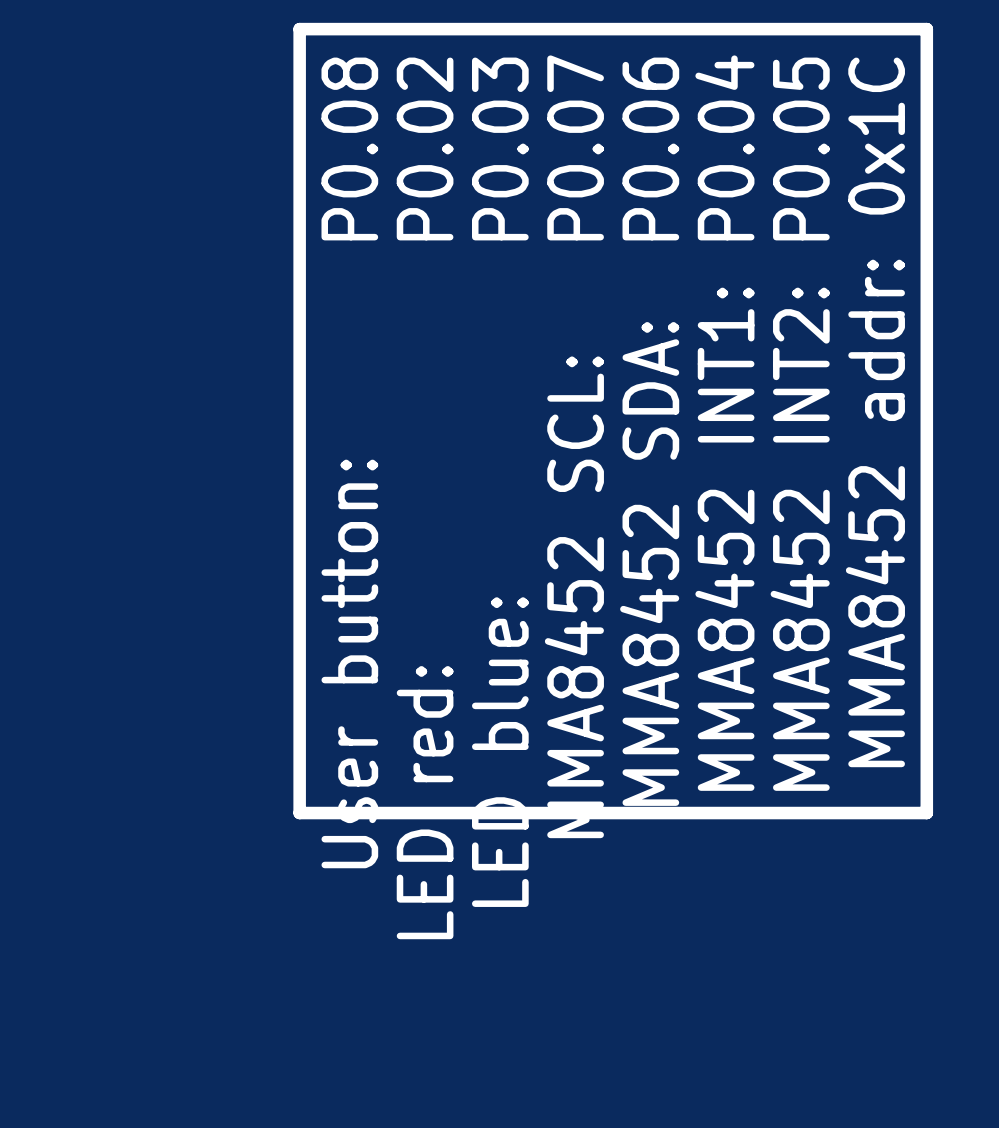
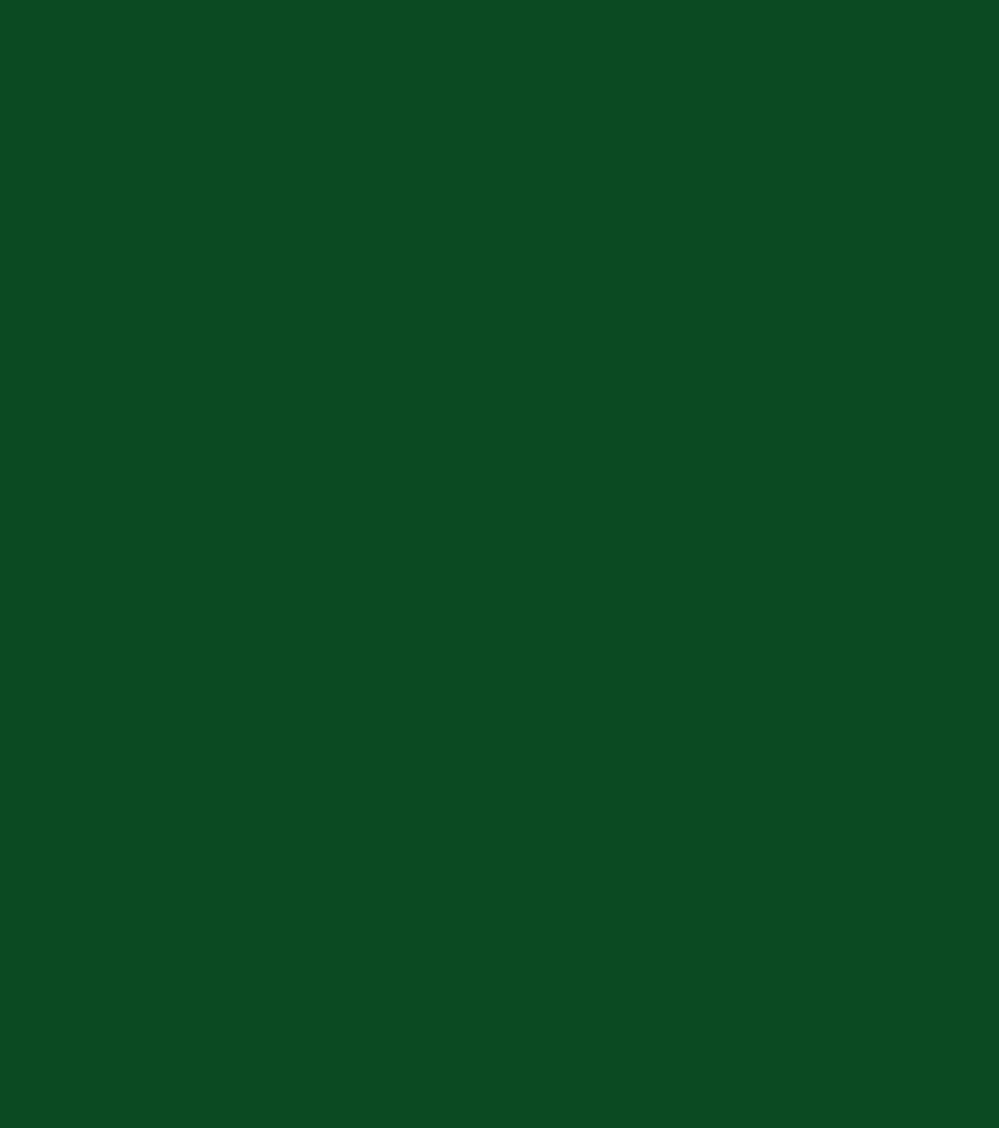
line: (926, 29) (926, 813) (299, 813) (299, 29) (926, 29) -> none
text: MMA8452 addr: 0x1C (875, 412) -> none
text: MMA8452 INT1: P0.04 (724, 423) -> none
text: MMA8452 INT2: P0.05 (800, 424) -> none
text: MMA8452 SDA: P0.06 (649, 431) -> none
text: MMA8452 SCL: P0.07 (574, 446) -> none
text: User button: P0.08 (349, 462) -> none
text: LED blue: P0.03 (500, 482) -> none
text: LED red: P0.02 (425, 498) -> none

